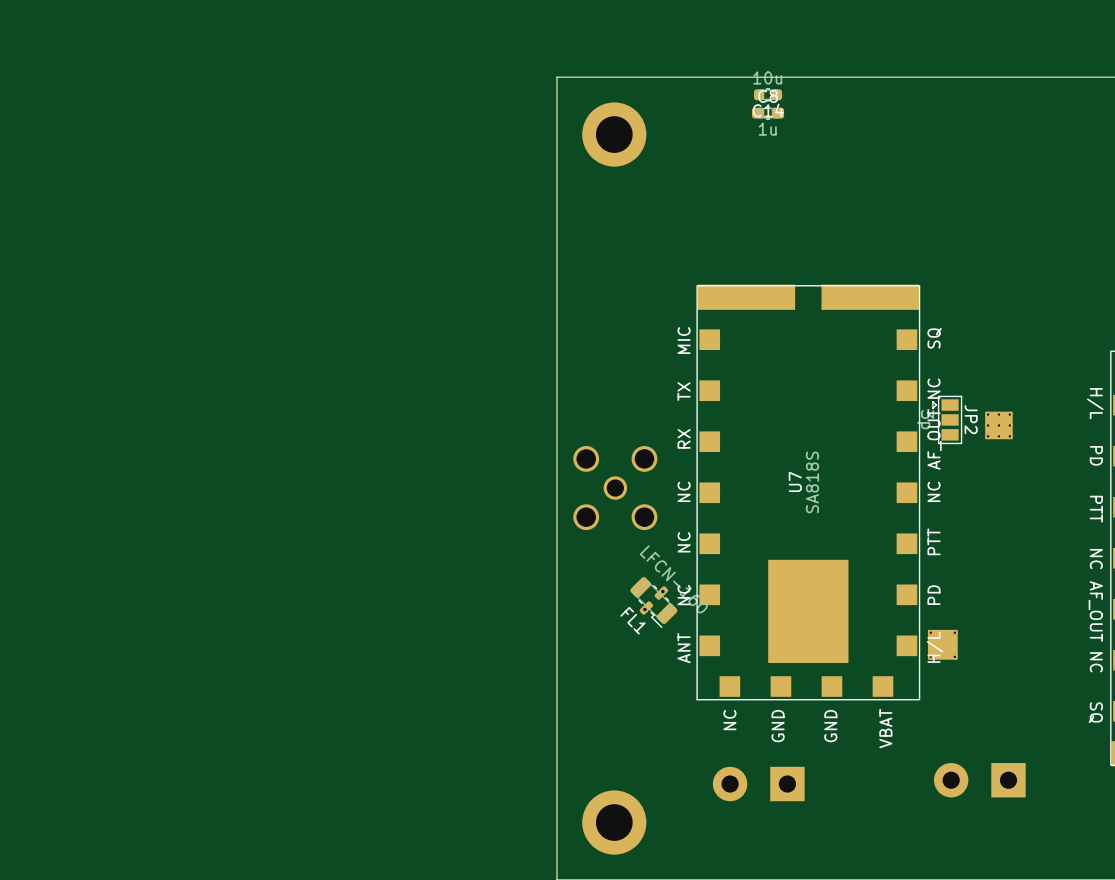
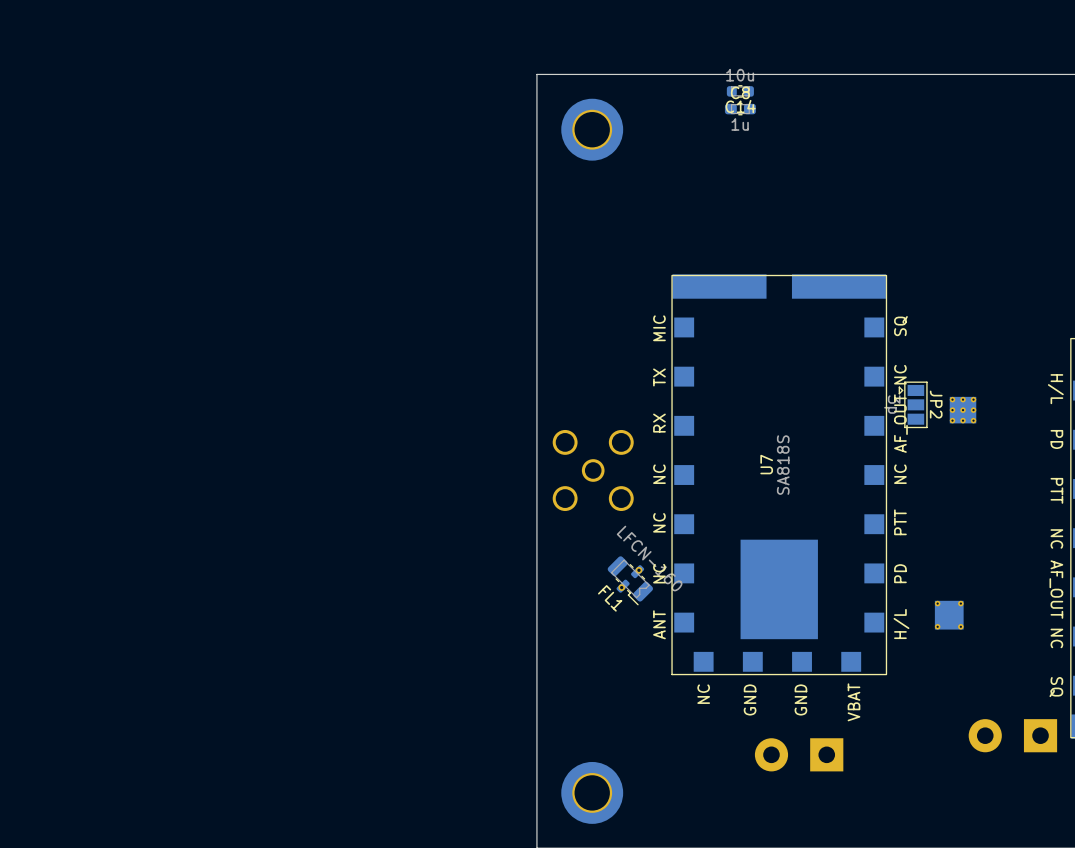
part position: (942, 644) -> (949, 615)
part position: (979, 780) -> (1012, 735)
part position: (758, 784) -> (799, 754)

